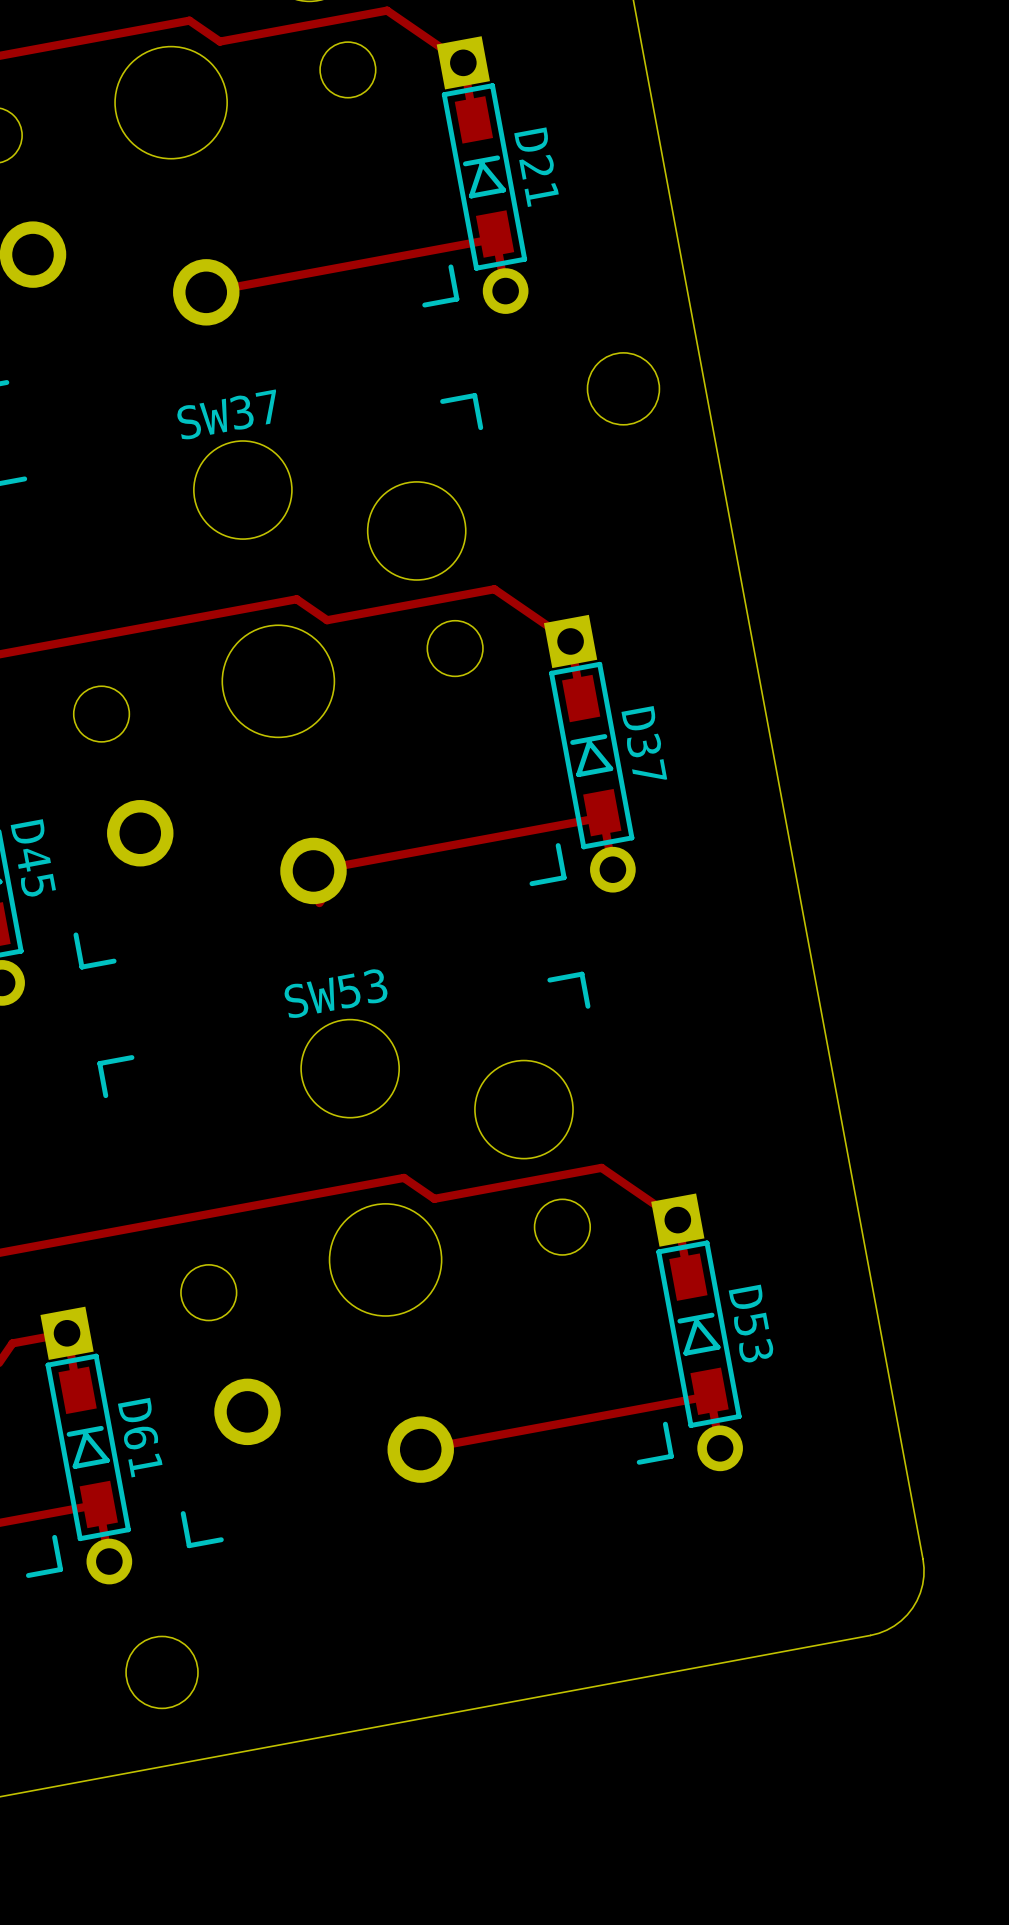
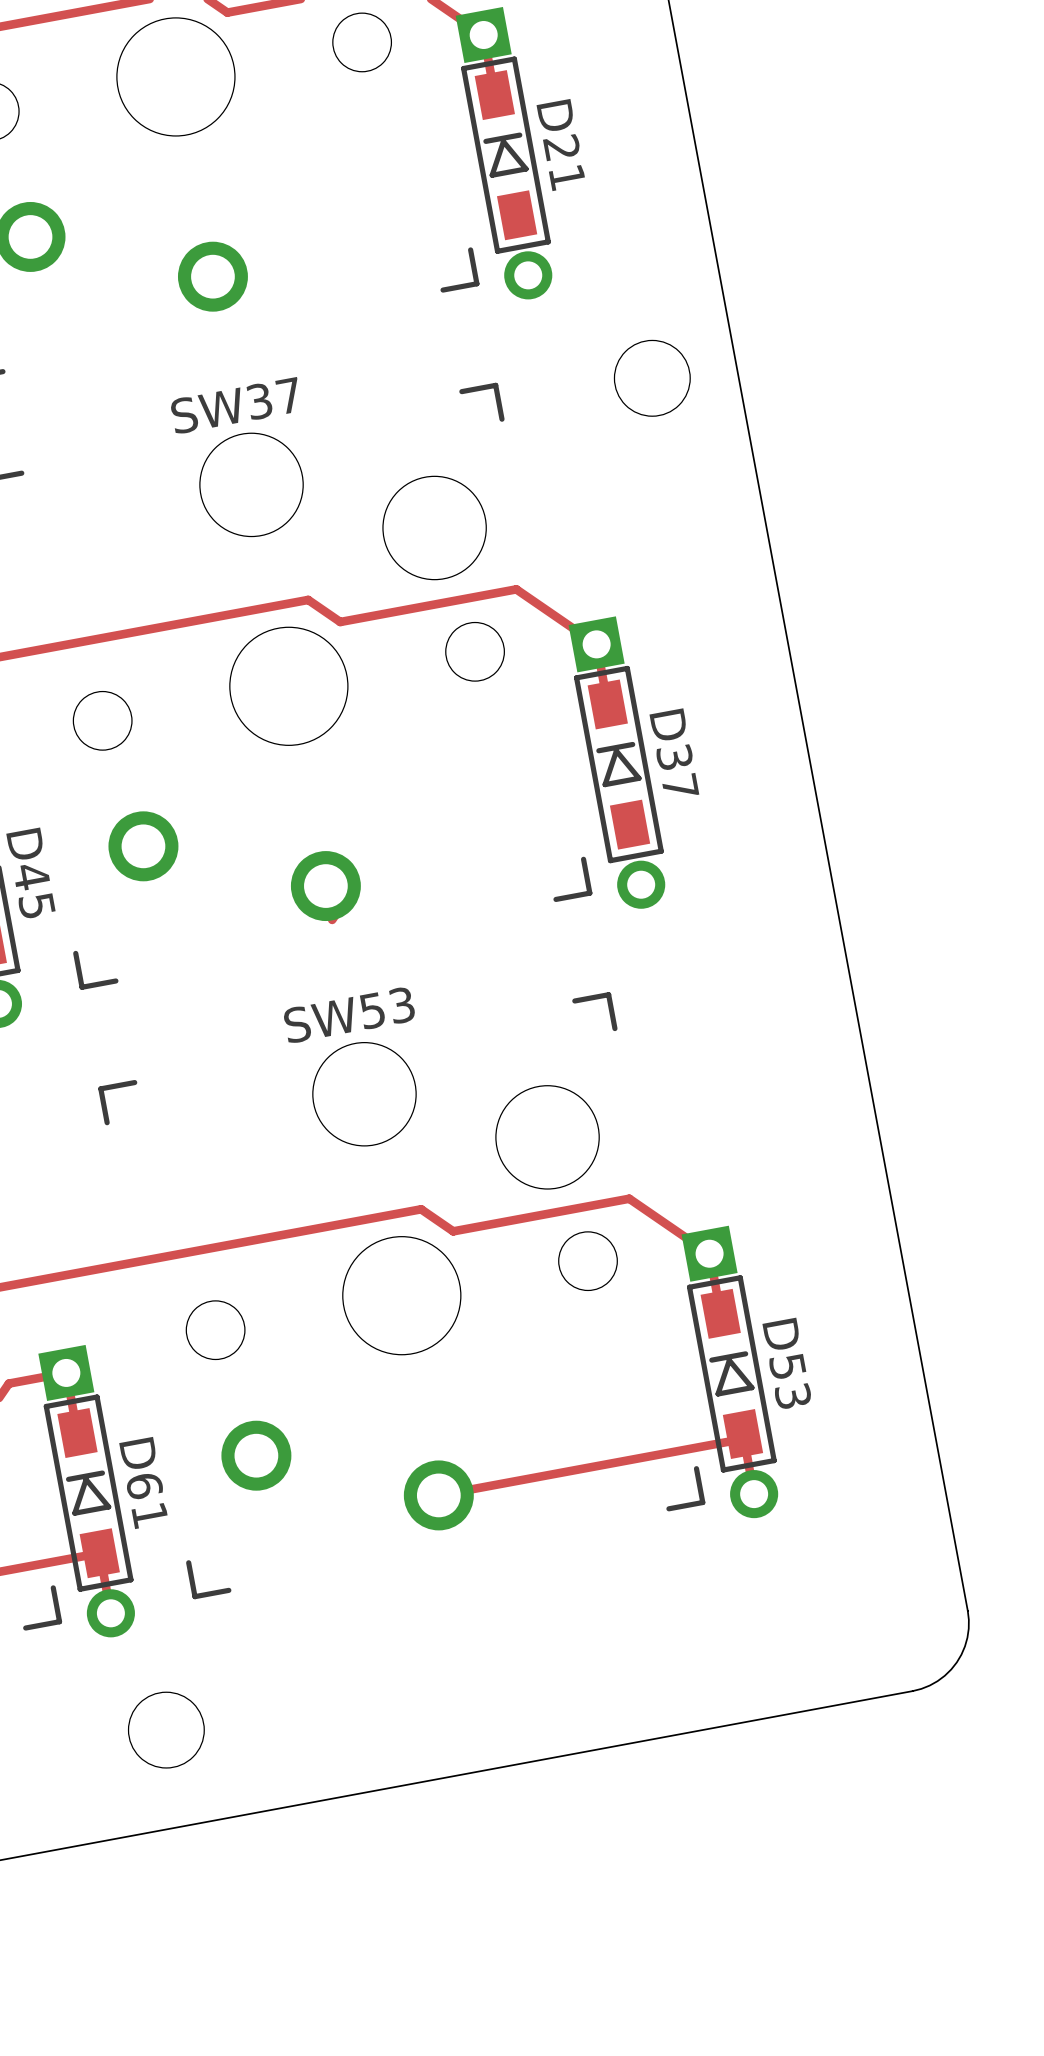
track: (505, 291) (495, 234) (491, 239) (206, 292) -> none
track: (612, 869) (602, 812) (598, 818) (313, 870) -> none

